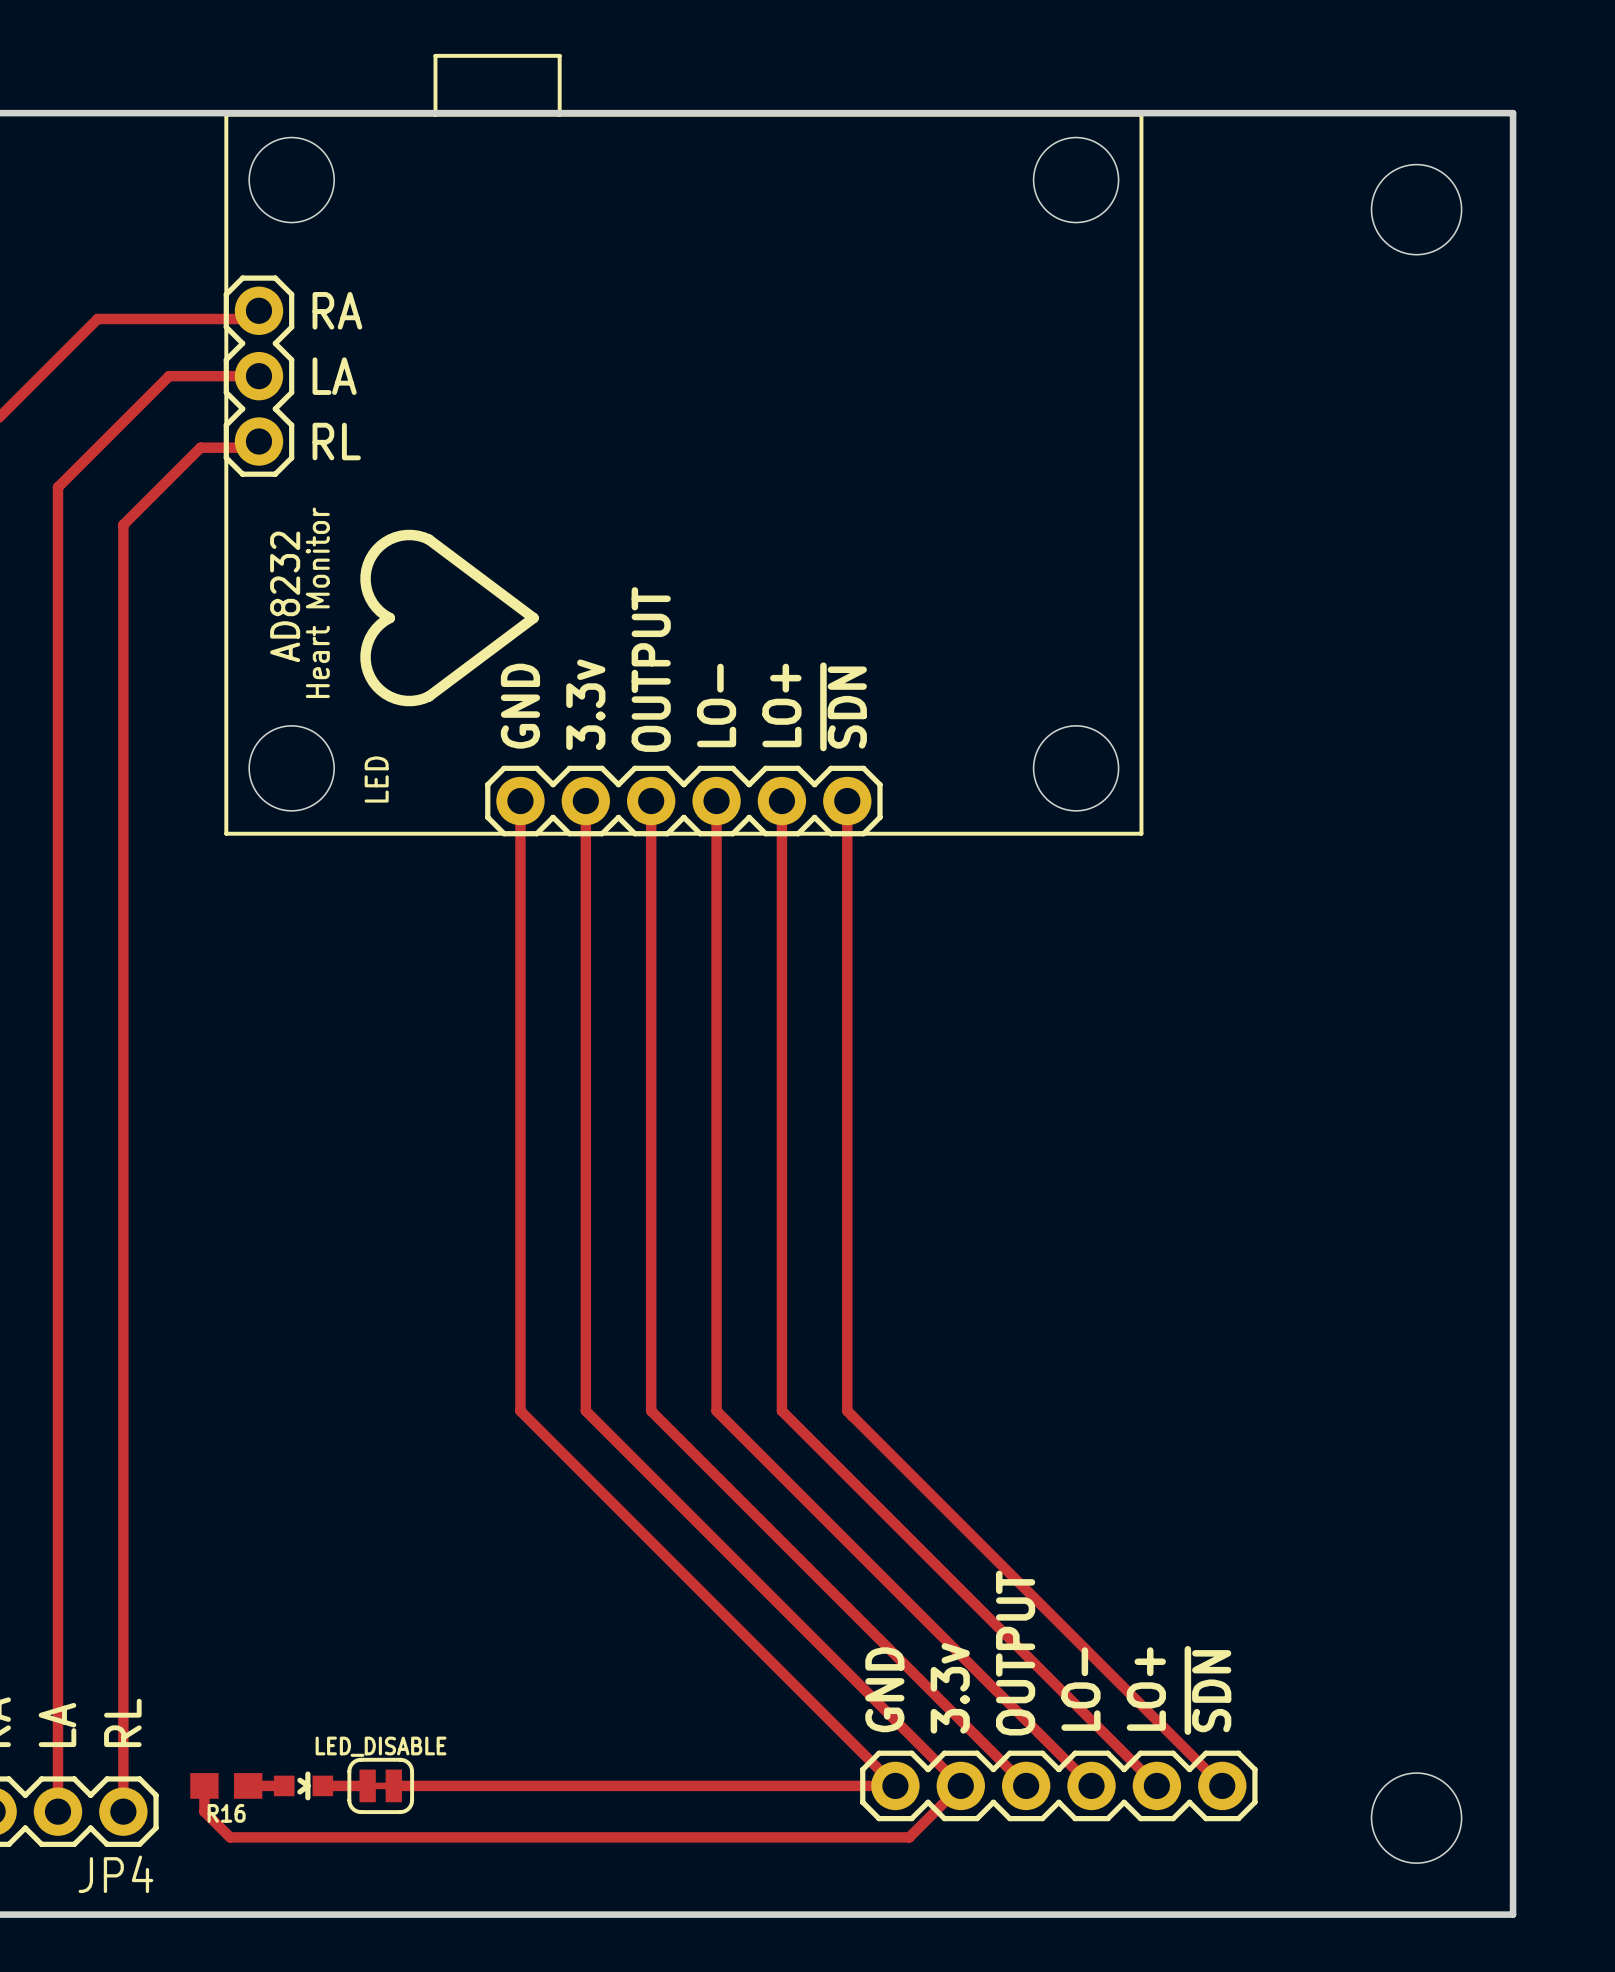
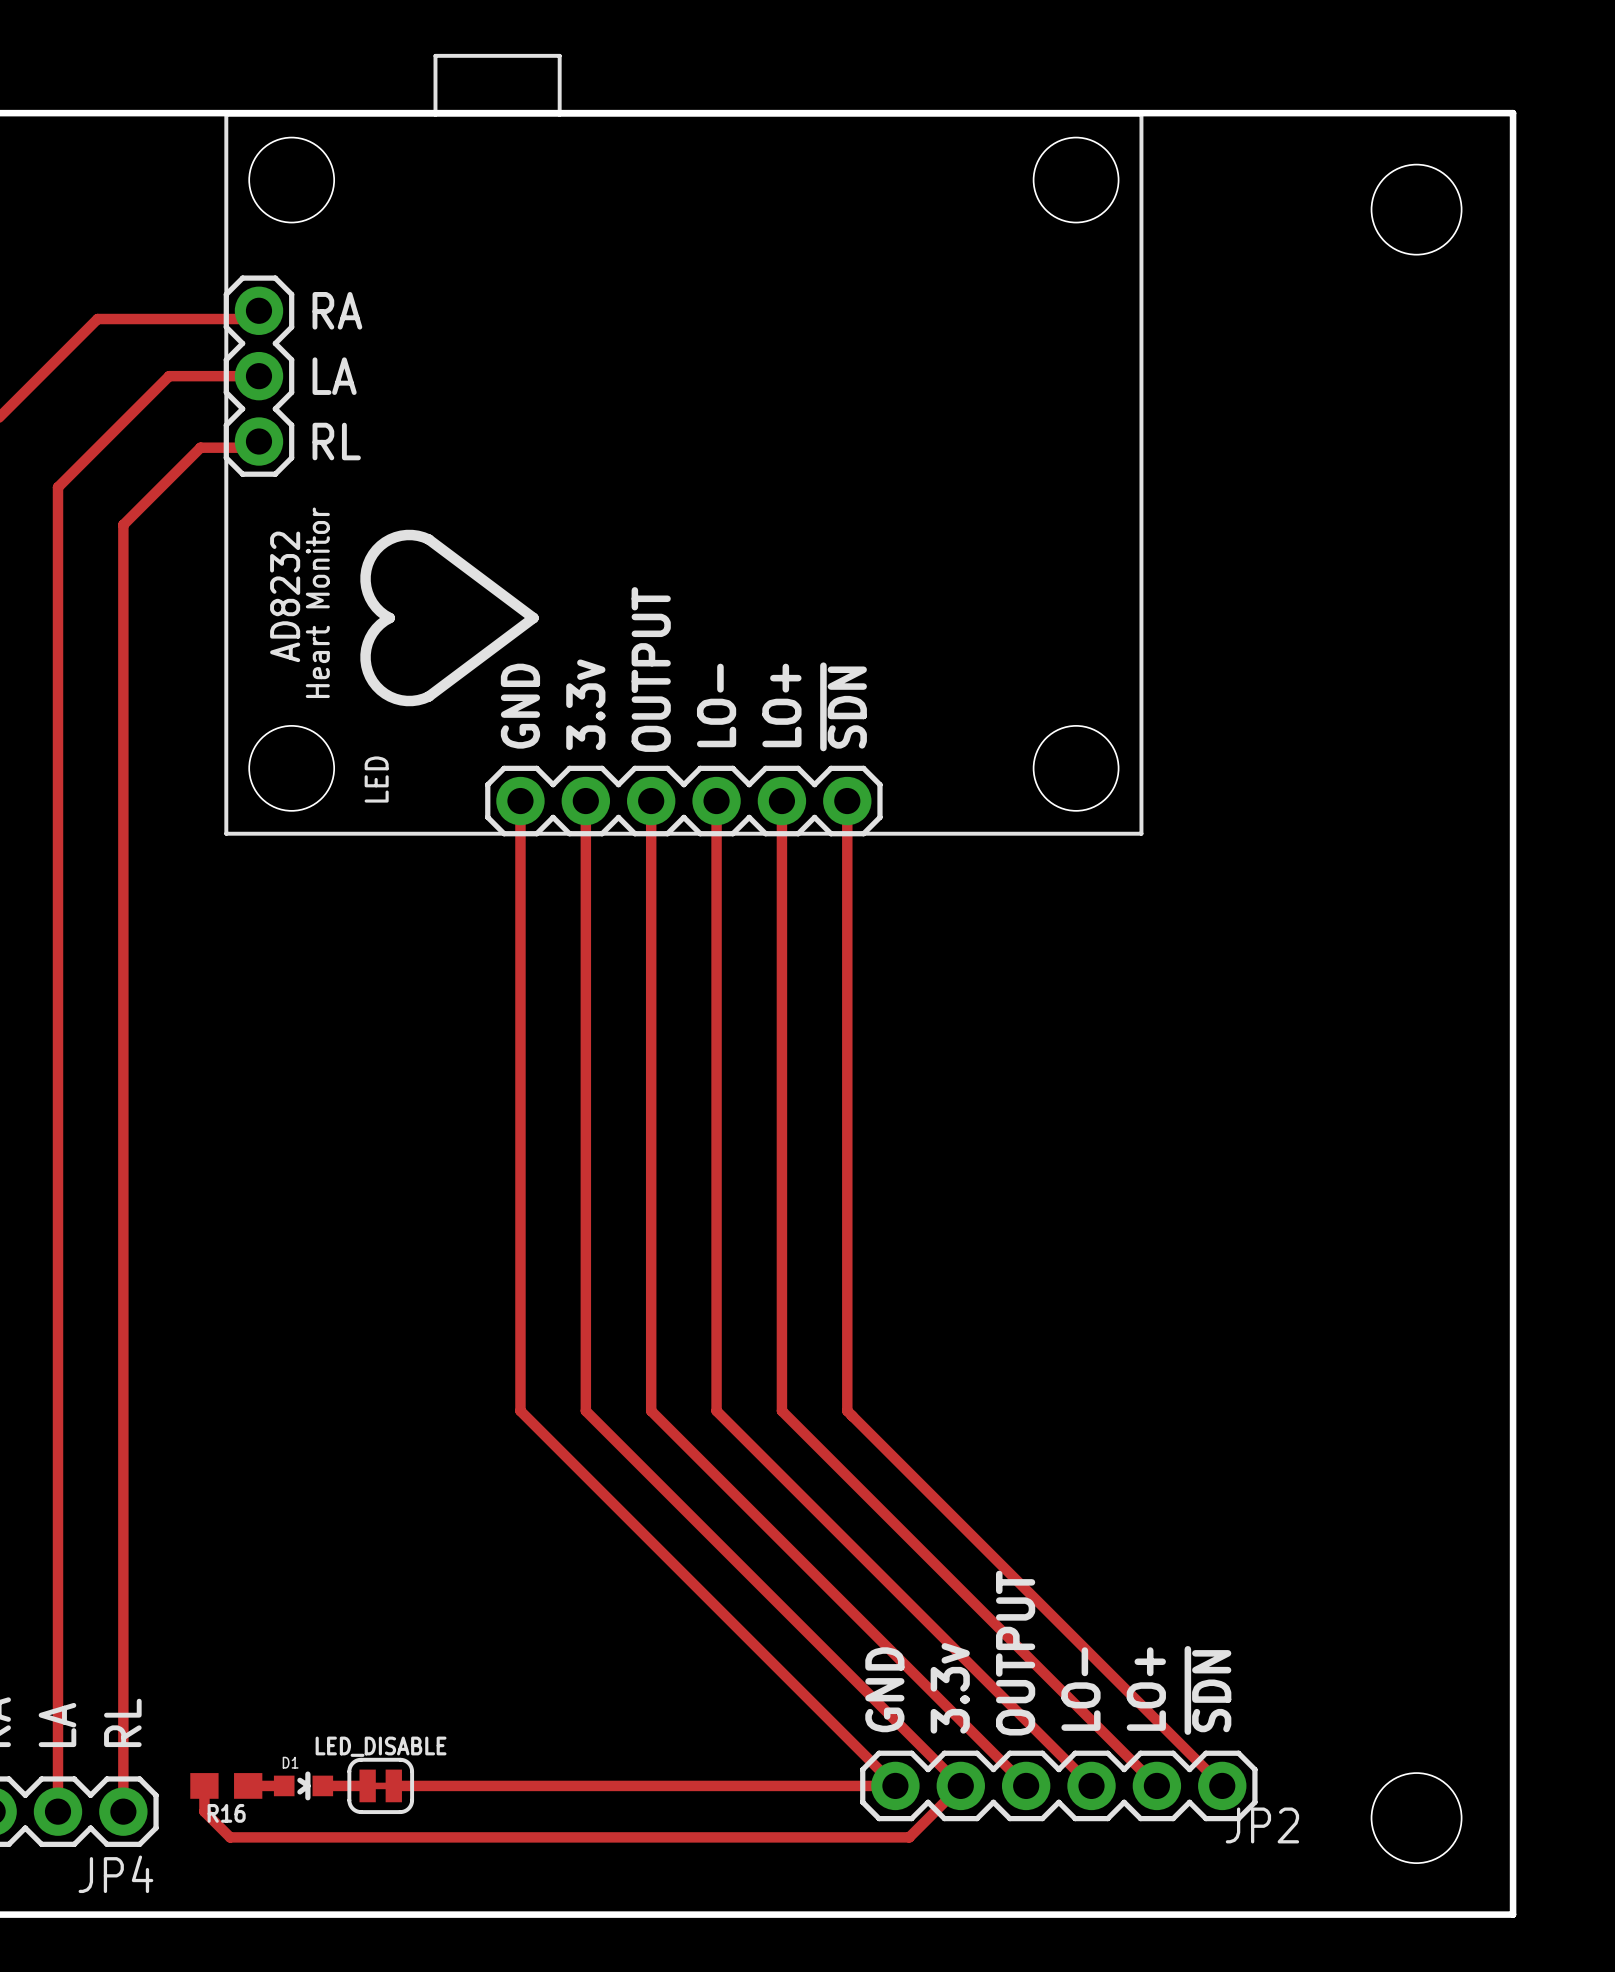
D1 name: none -> D1 (290, 1762)
JP2 name: none -> JP2 (1262, 1825)

